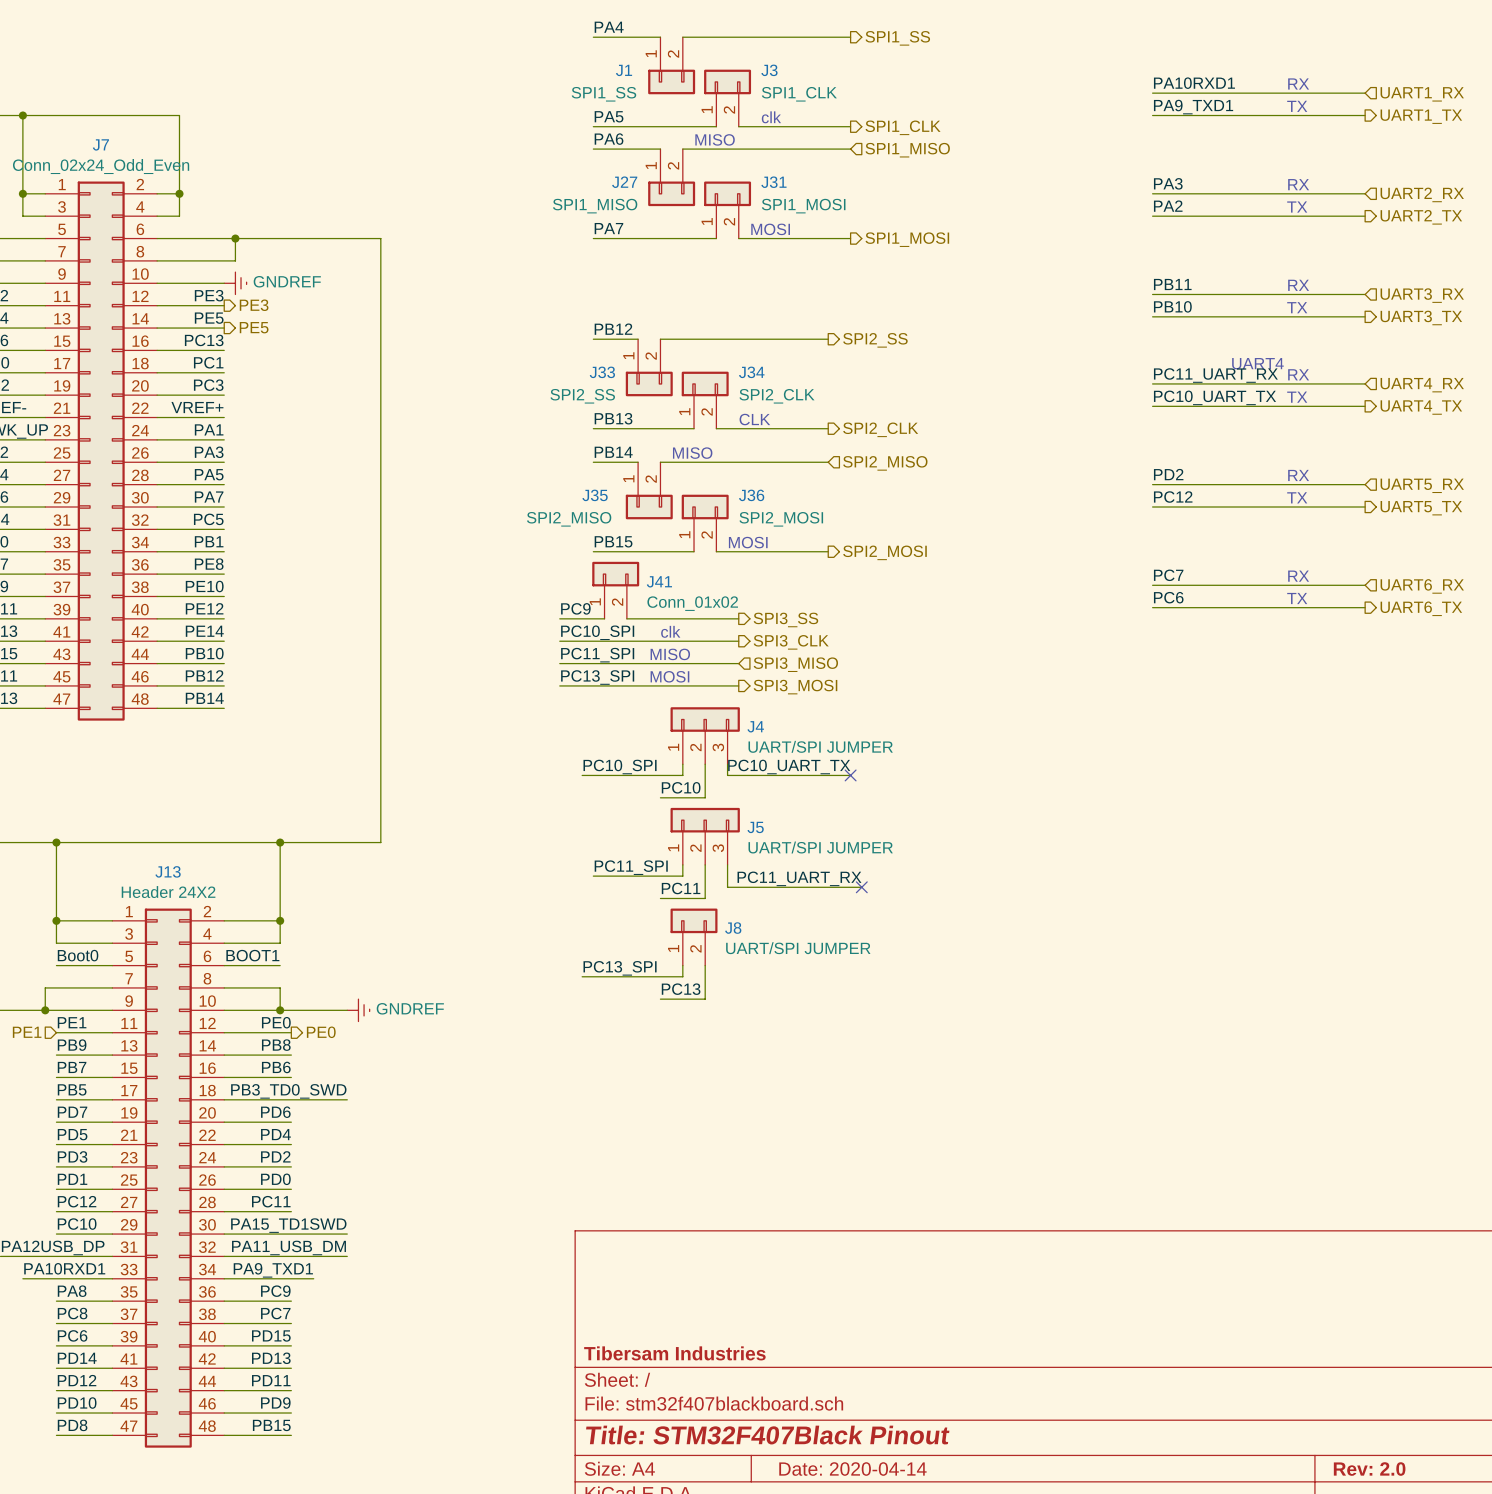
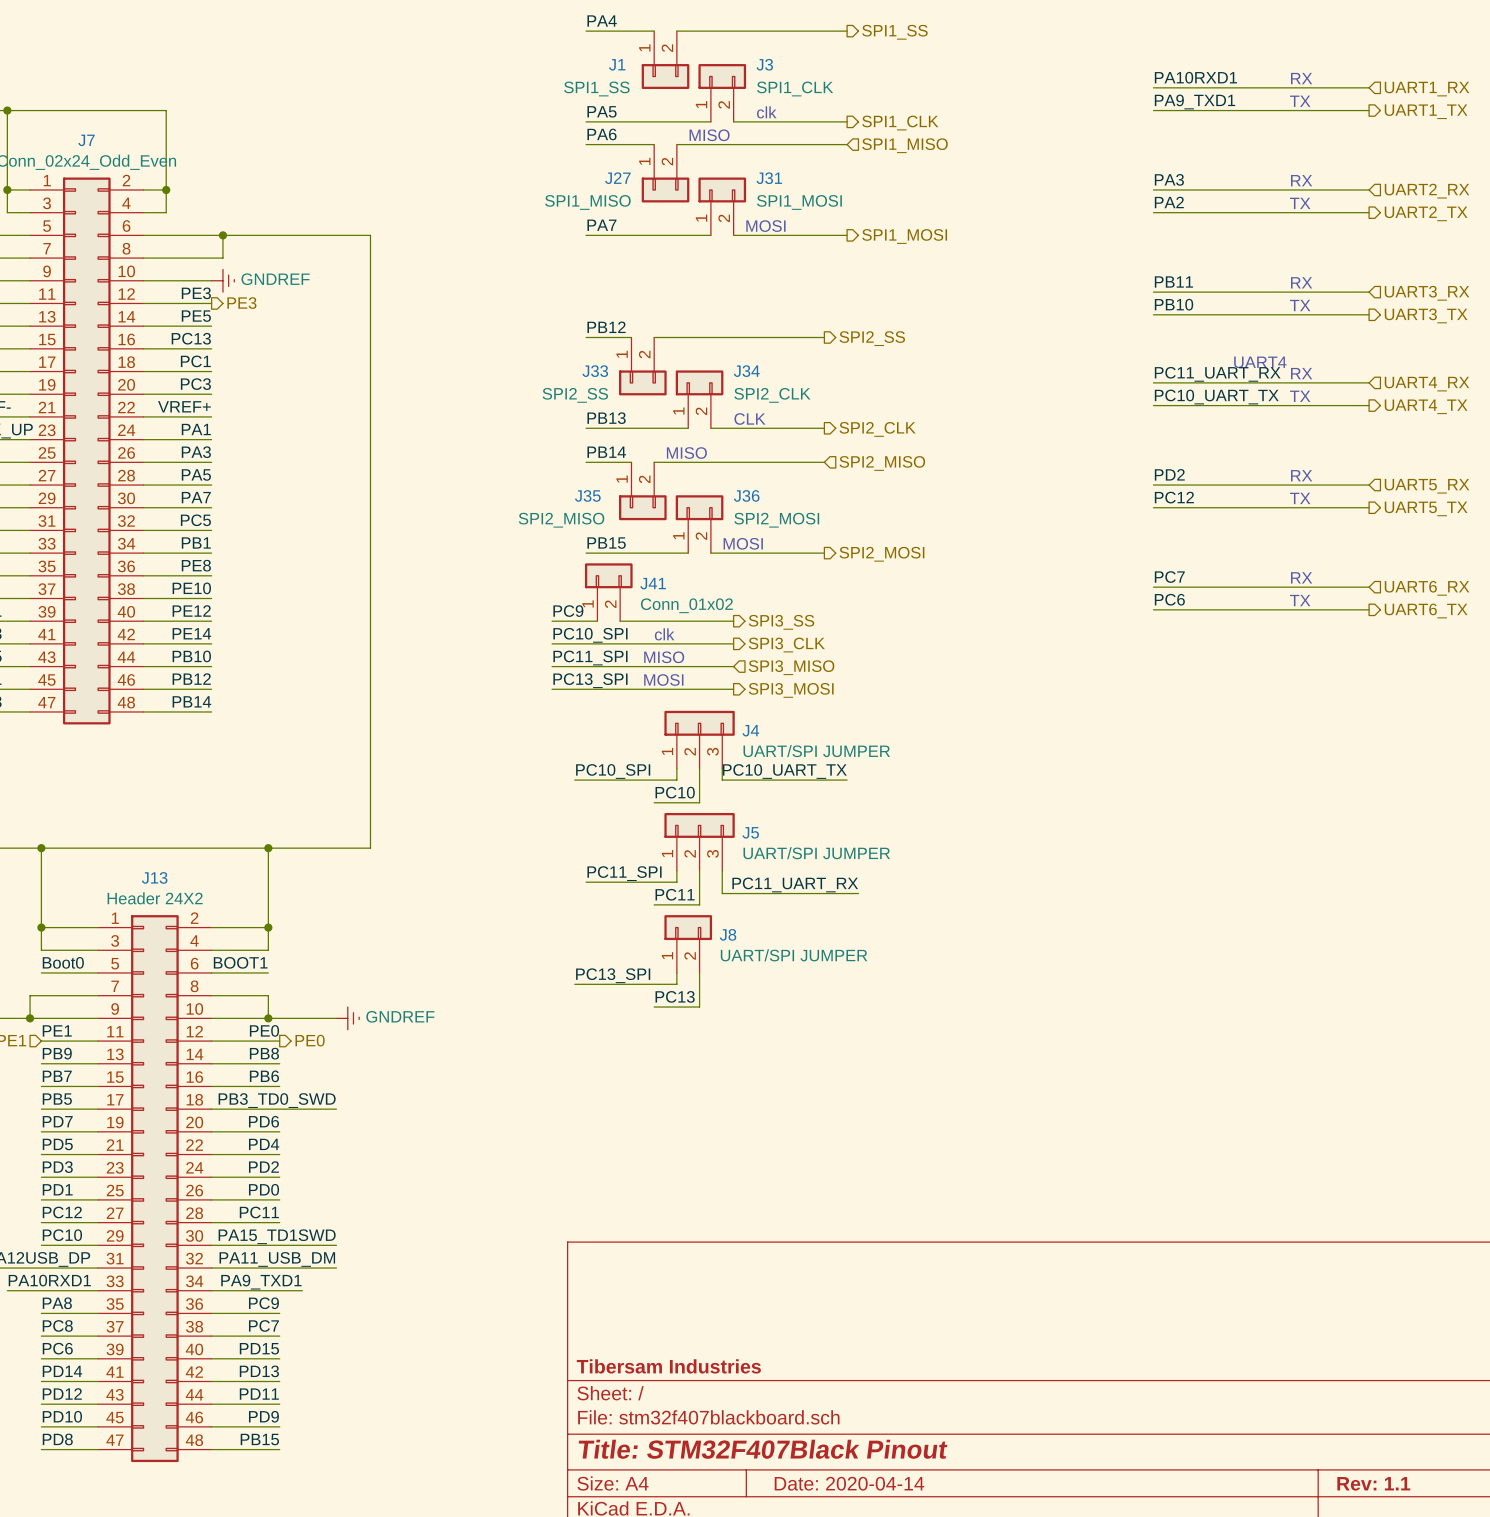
hierarchical label: PE5 (254, 327) -> none
no-connect mark: (850, 775) -> none
no-connect mark: (861, 887) -> none
title block: Rev: 2.0 (1369, 1469) -> Rev: 1.1 (1373, 1483)

